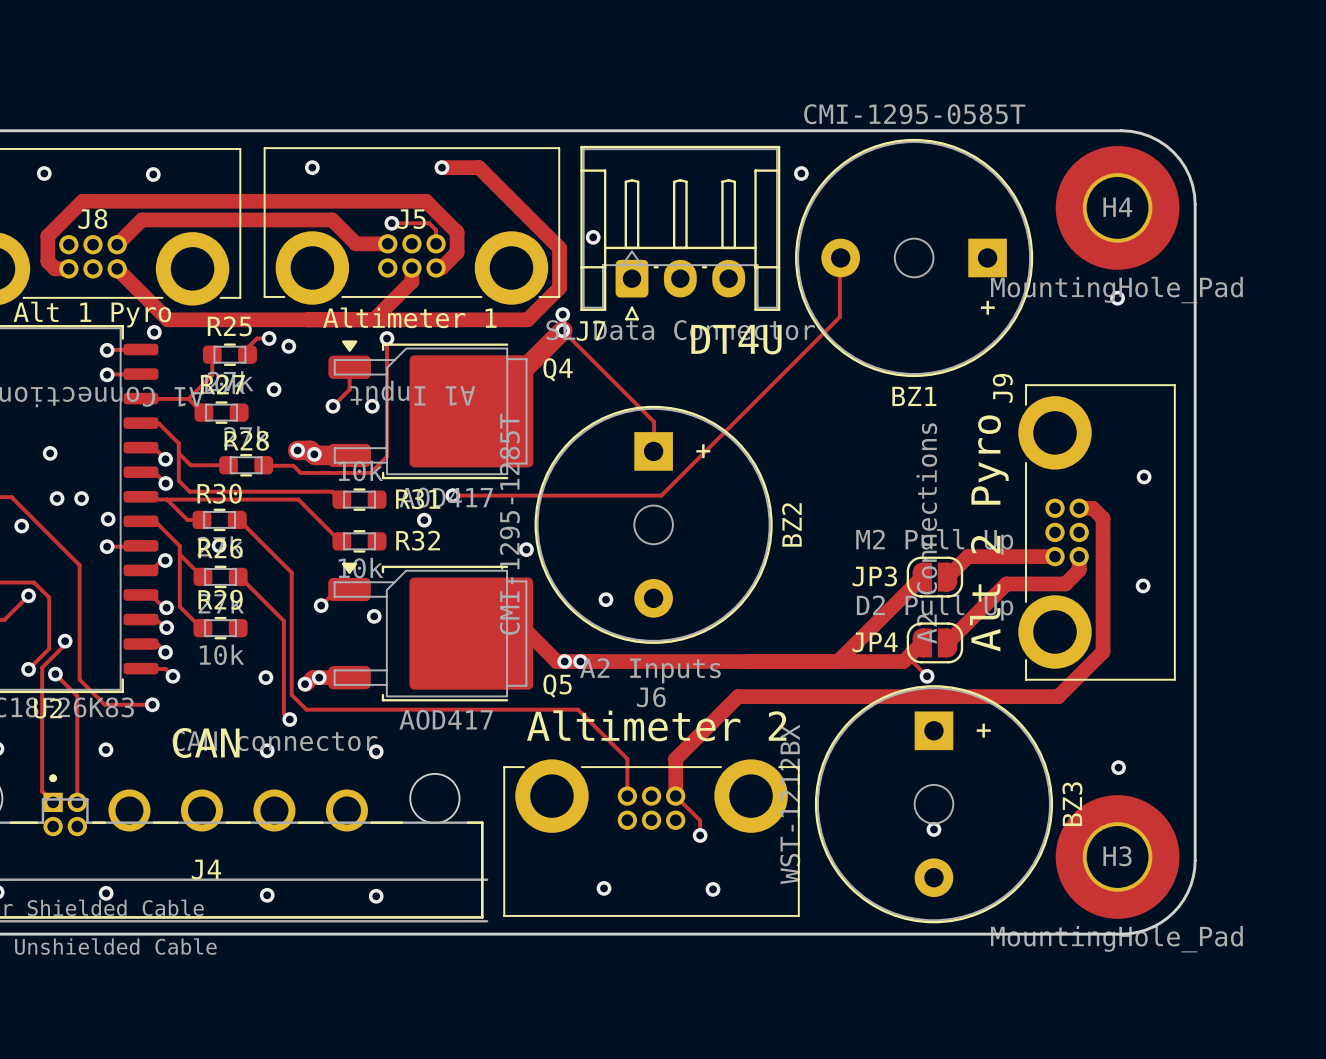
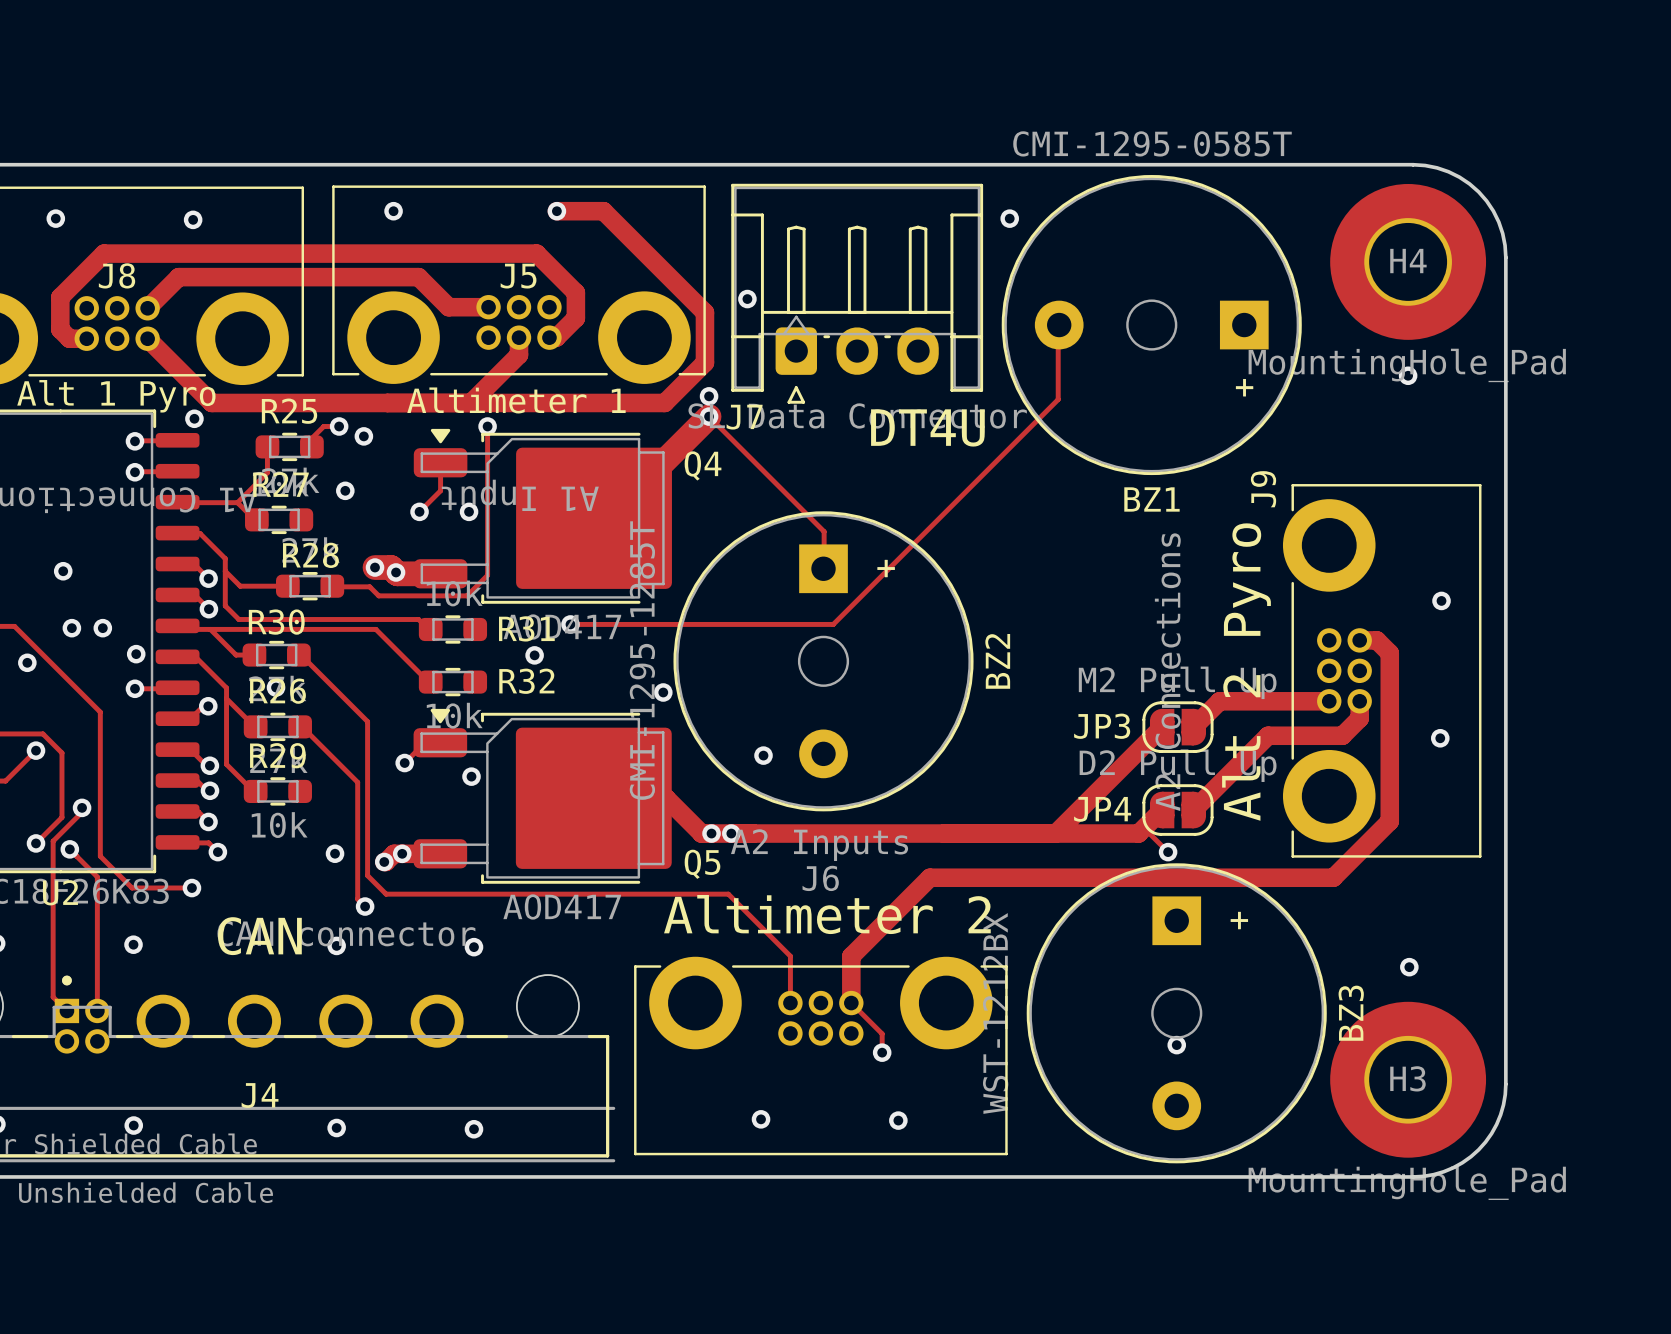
track: (391, 223) (429, 223) (436, 230) (436, 243) -> none
via: (391, 223) -> none

